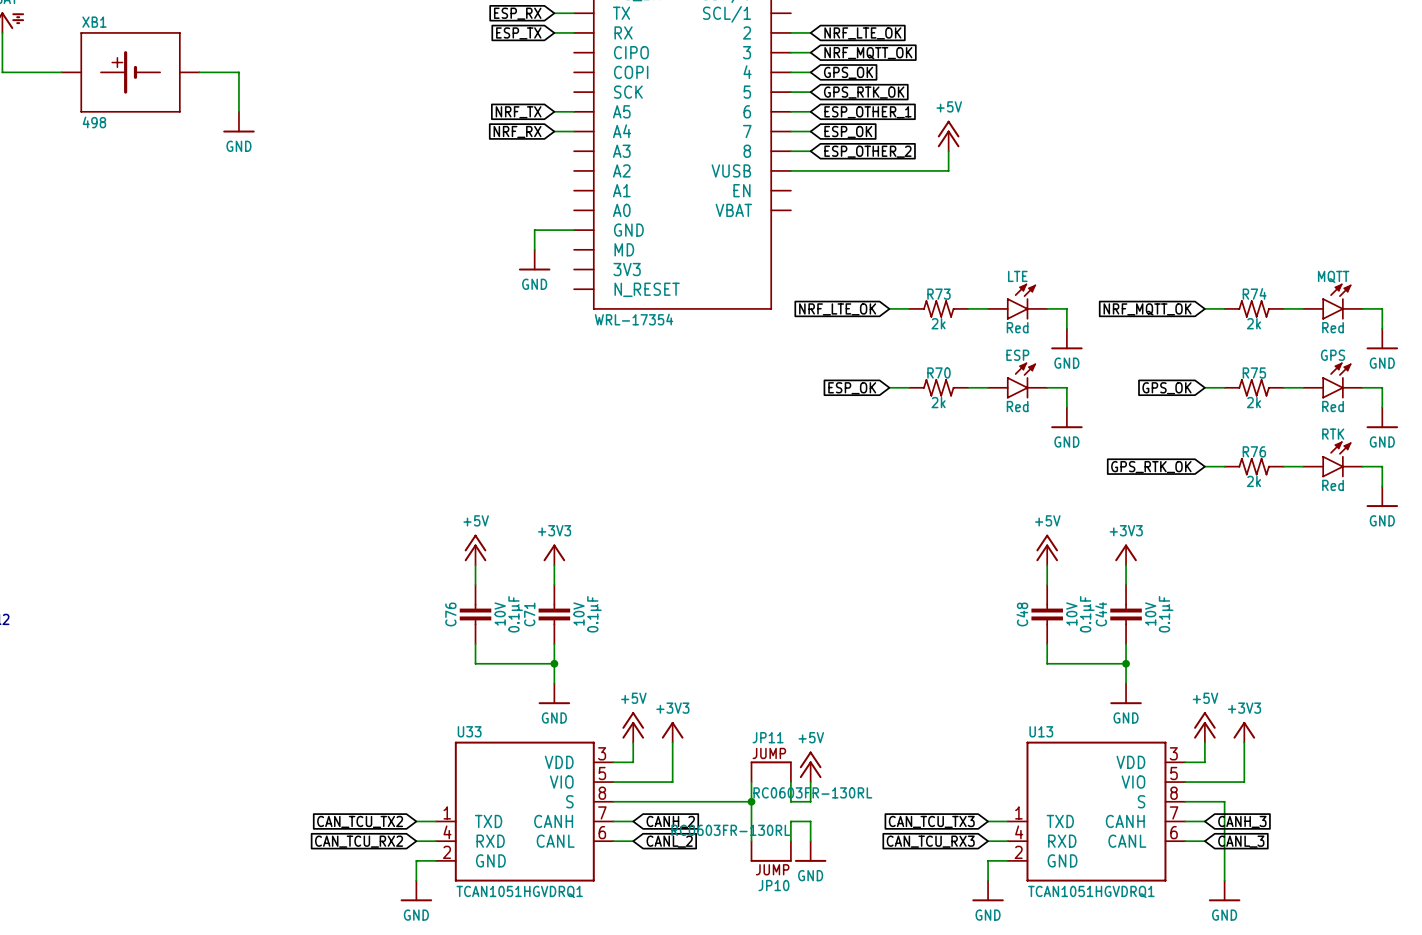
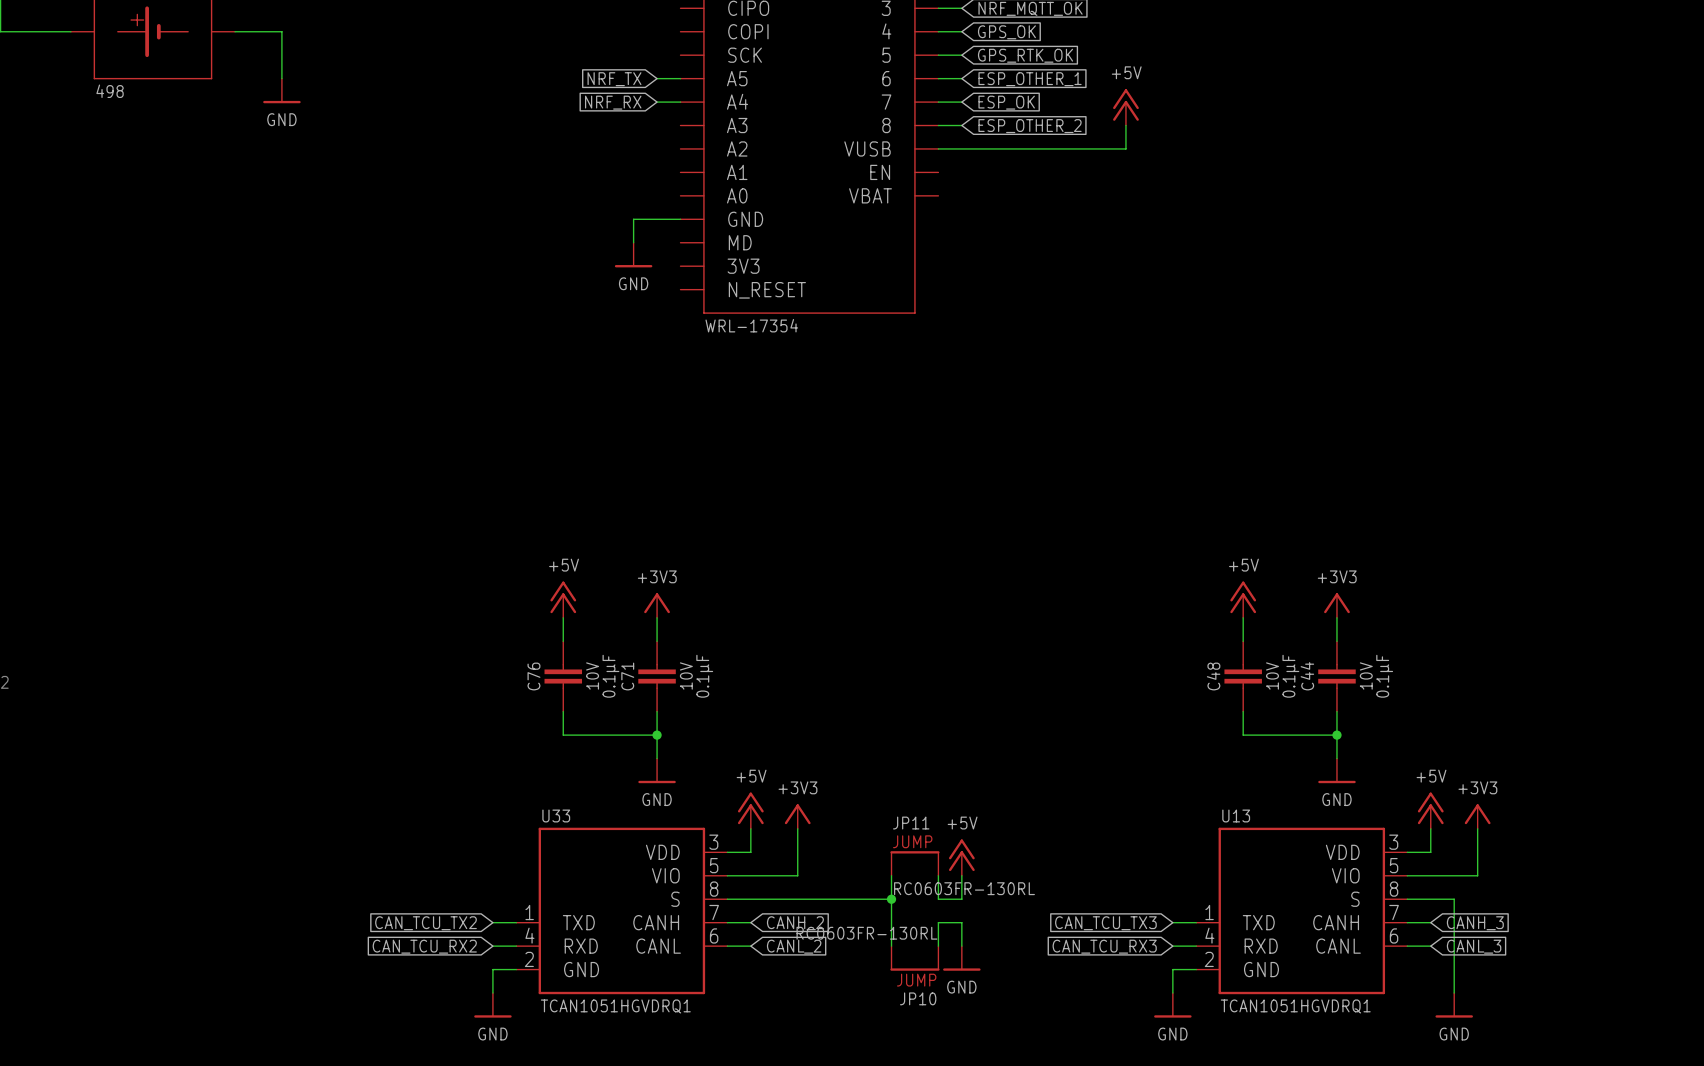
LTE: (1017, 301) -> none
MQTT: (1333, 301) -> none
wire: (889, 308) (909, 308) -> none
R73: (938, 308) -> none
wire: (968, 308) (988, 308) -> none
wire: (1047, 308) (1066, 308) (1066, 328) -> none
wire: (1204, 308) (1224, 308) -> none
R74: (1254, 308) -> none
wire: (1283, 308) (1303, 308) -> none
wire: (1362, 308) (1382, 308) (1382, 328) -> none
global label: NRF_LTE_OK (837, 309) -> none
global label: NRF_MQTT_OK (1147, 309) -> none
power symbol: GND (1066, 339) -> none
power symbol: GND (1382, 339) -> none
ESP: (1017, 380) -> none
GPS: (1333, 380) -> none
wire: (889, 387) (909, 387) -> none
R70: (938, 387) -> none
wire: (968, 387) (988, 387) -> none
wire: (1047, 387) (1066, 387) (1066, 407) -> none
wire: (1204, 387) (1224, 387) -> none
R75: (1254, 387) -> none
wire: (1283, 387) (1303, 387) -> none
wire: (1362, 387) (1382, 387) (1382, 407) -> none
global label: ESP_OK (852, 388) -> none
global label: GPS_OK (1166, 388) -> none
power symbol: GND (1066, 417) -> none
power symbol: GND (1382, 417) -> none
RTK: (1333, 459) -> none
wire: (1204, 466) (1224, 466) -> none
R76: (1254, 466) -> none
wire: (1283, 466) (1303, 466) -> none
wire: (1362, 466) (1382, 466) (1382, 486) -> none
global label: GPS_RTK_OK (1151, 467) -> none
power symbol: GND (1382, 496) -> none

